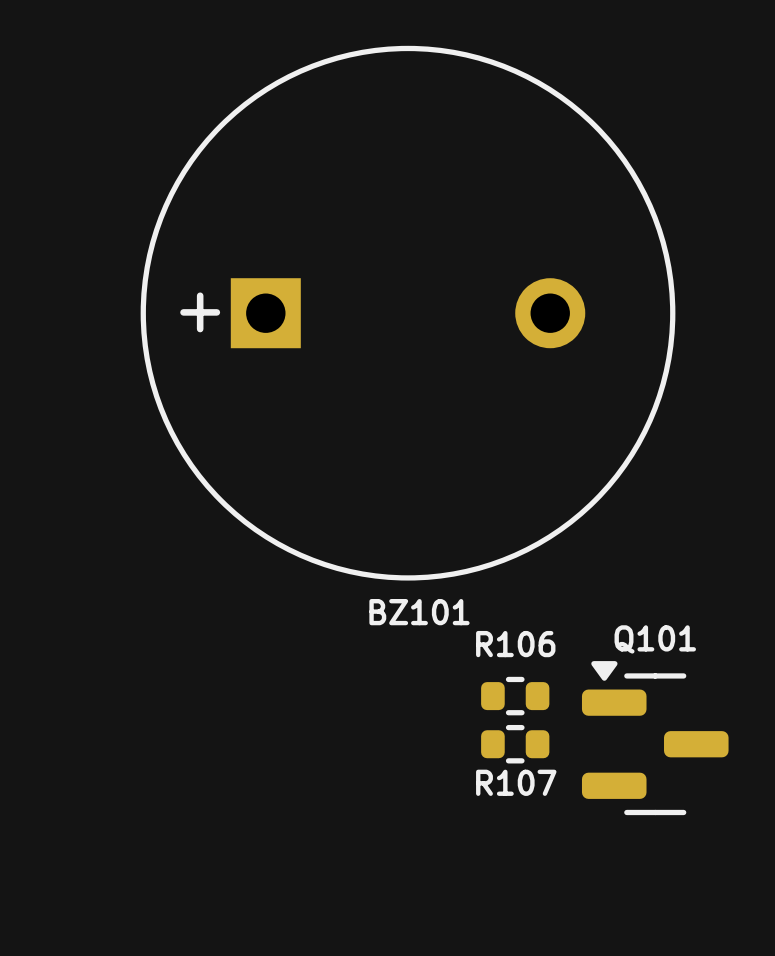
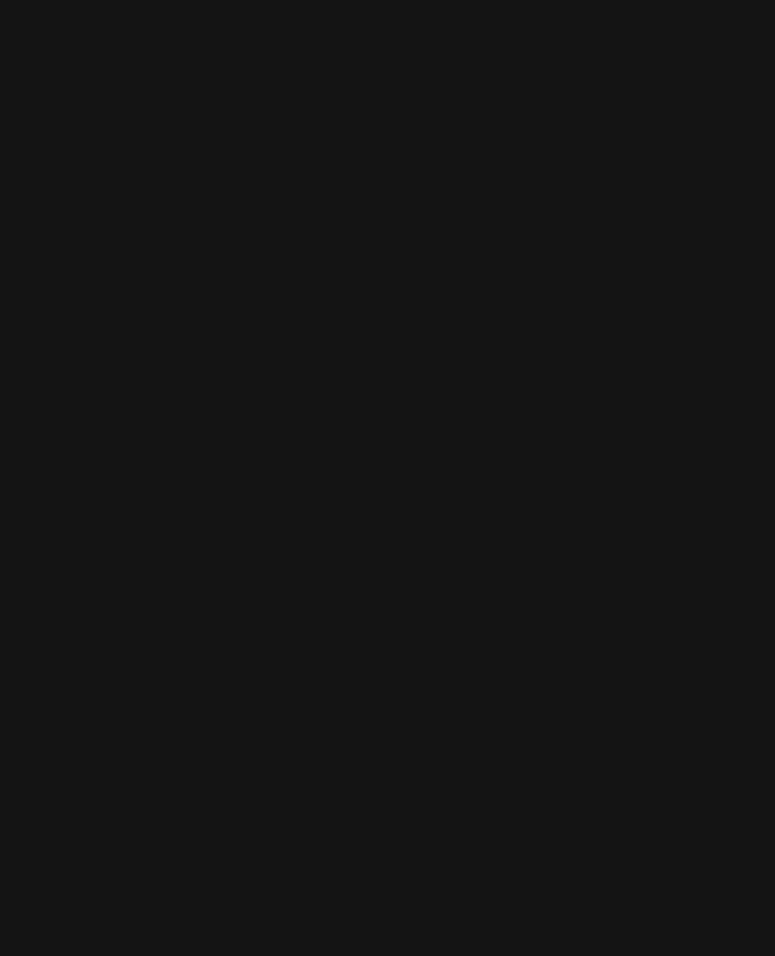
BZ101: (408, 313) -> none
R106: (515, 696) -> none
Q101: (655, 738) -> none
R107: (515, 744) -> none

